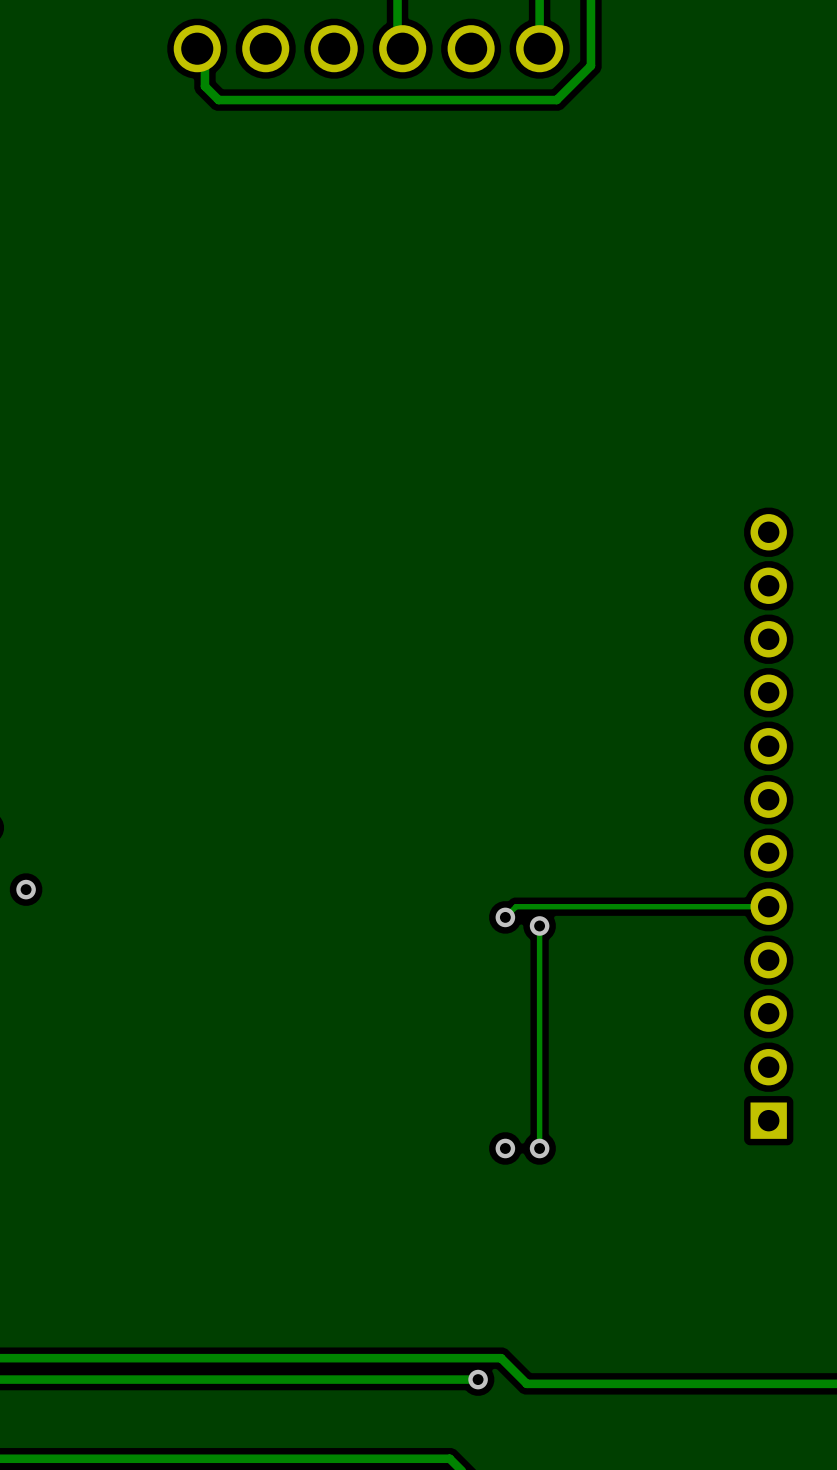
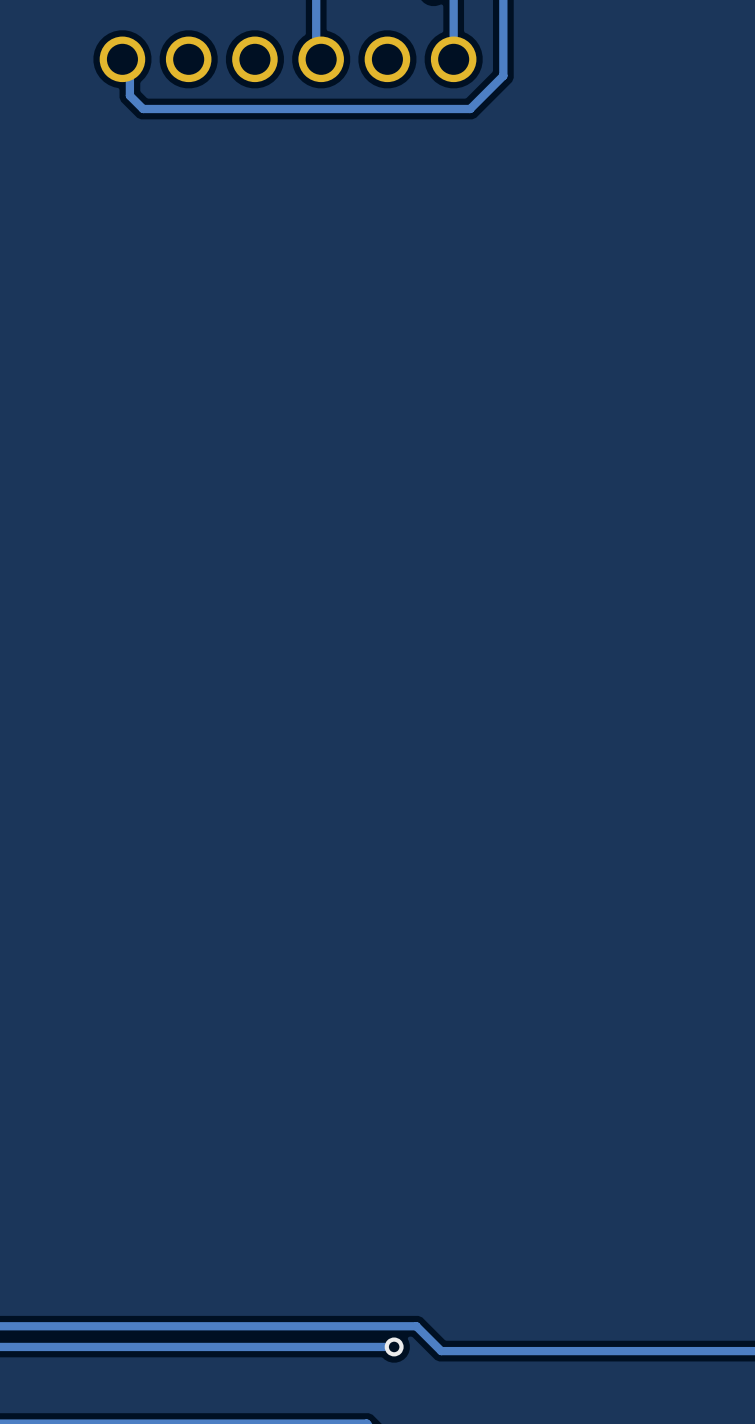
part: (768, 826) -> none
track: (768, 906) (516, 906) (505, 917) -> none
via: (505, 917) -> none
track: (539, 925) (539, 1148) -> none
via: (539, 925) -> none
via: (505, 1148) -> none
via: (539, 1148) -> none

